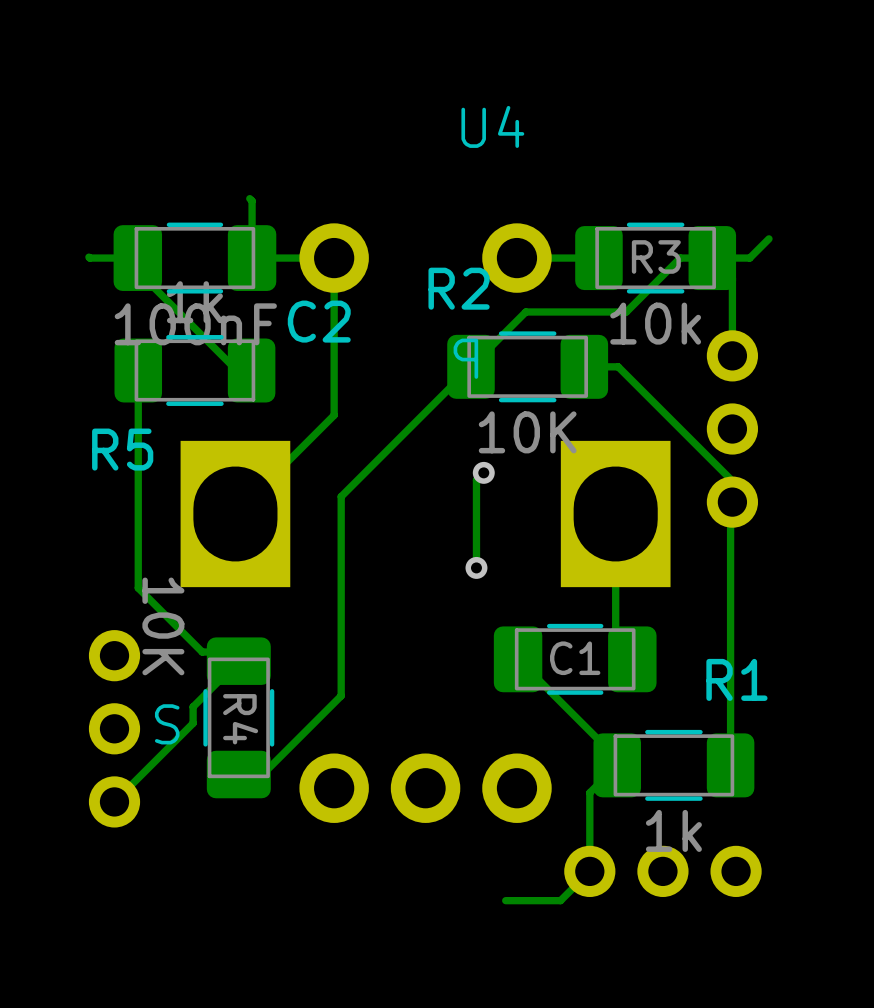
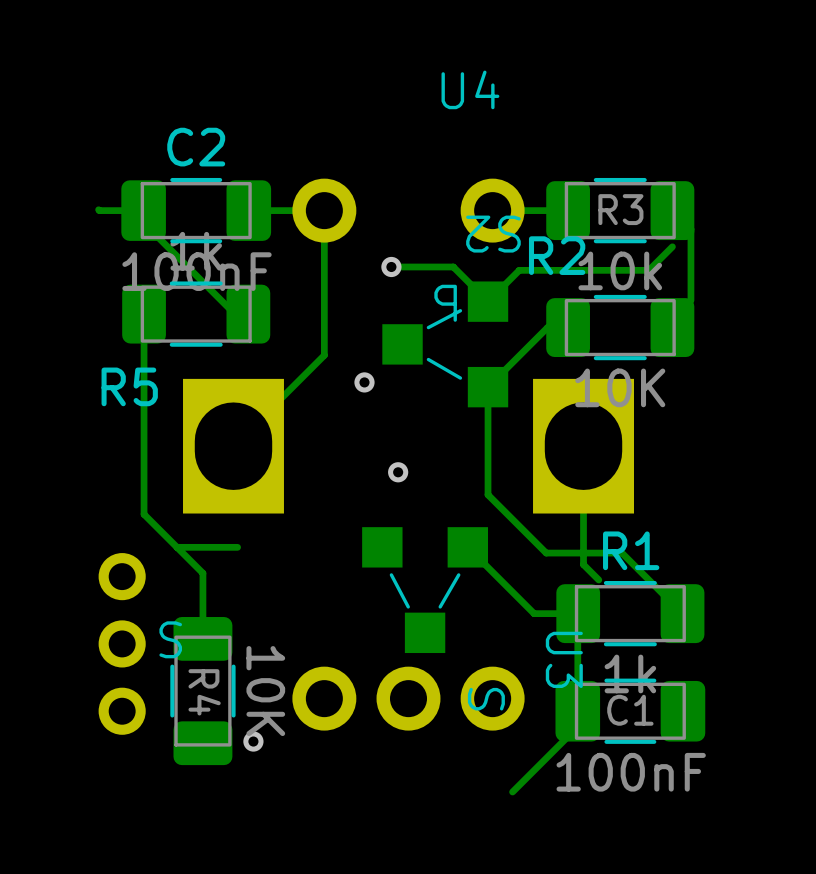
track: (249, 198) (252, 200) (252, 258) -> none
track: (768, 238) (749, 258) (680, 258) (626, 311) (525, 311) (341, 496) (341, 695) (262, 774) (238, 774) -> none
track: none -> (672, 246) (648, 270) (519, 270) (488, 301) (453, 266) (391, 266)
via: none -> (391, 266)
C2 name position: C2 (319, 321) -> C2 (196, 147)
R2 position: (527, 366) -> (620, 327)
track: (584, 366) (618, 366) (732, 481) (732, 505) (730, 507) (730, 765) -> none
track: none -> (568, 327) (547, 327) (488, 387) (488, 494) (546, 553) (621, 553) (682, 613)
part: none -> (445, 344)
part: (732, 428) -> none
via: none -> (364, 382)
track: (483, 472) (476, 480) (476, 567) -> none
via: (483, 472) -> none
via: none -> (398, 472)
via: (476, 567) -> none
track: none -> (237, 547) (177, 547)
track: none -> (467, 547) (534, 613) (578, 613)
R4 value position: 10K (163, 626) -> 10K (265, 691)
track: (202, 652) (229, 652) (238, 661) (193, 706) (193, 723) (114, 801) -> (202, 573) (202, 638)
track: (518, 659) (616, 759) -> none
C1 position: (575, 659) -> (630, 711)
U3: none -> (425, 590)
R1 name position: R1 (736, 679) -> R1 (631, 550)
track: none -> (577, 614) (577, 726) (512, 792)
R4 position: (238, 717) -> (202, 691)
track: (617, 759) (617, 765) (589, 792) (589, 871) (560, 900) (505, 900) -> none
R1 position: (673, 765) -> (630, 613)
via: none -> (253, 741)
C1 value: none -> 100nF (631, 772)
part: (662, 871) -> none

